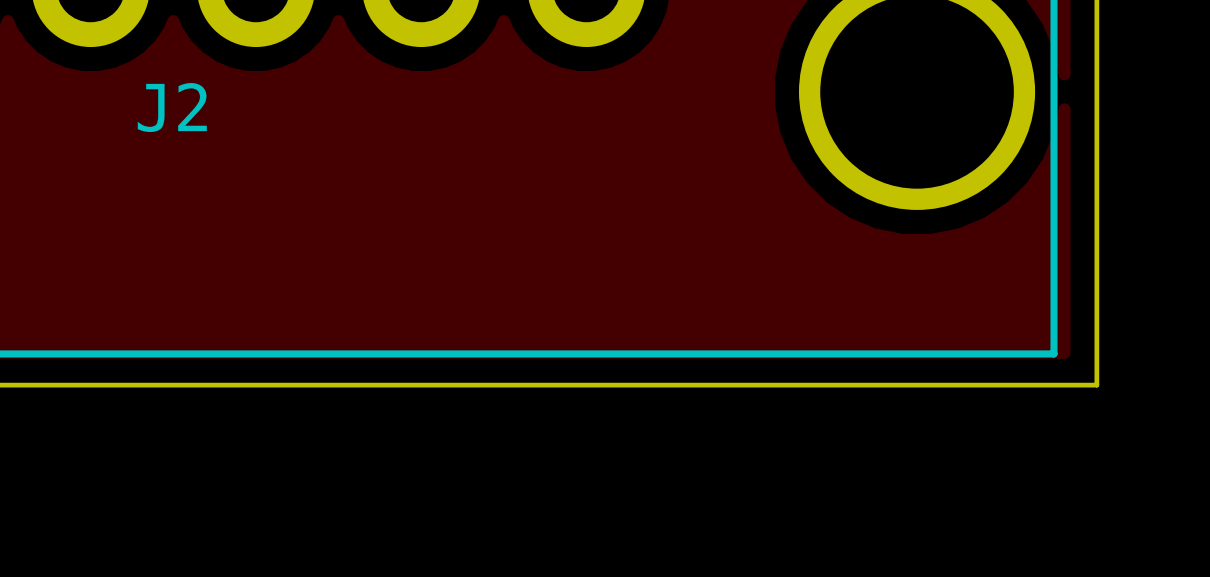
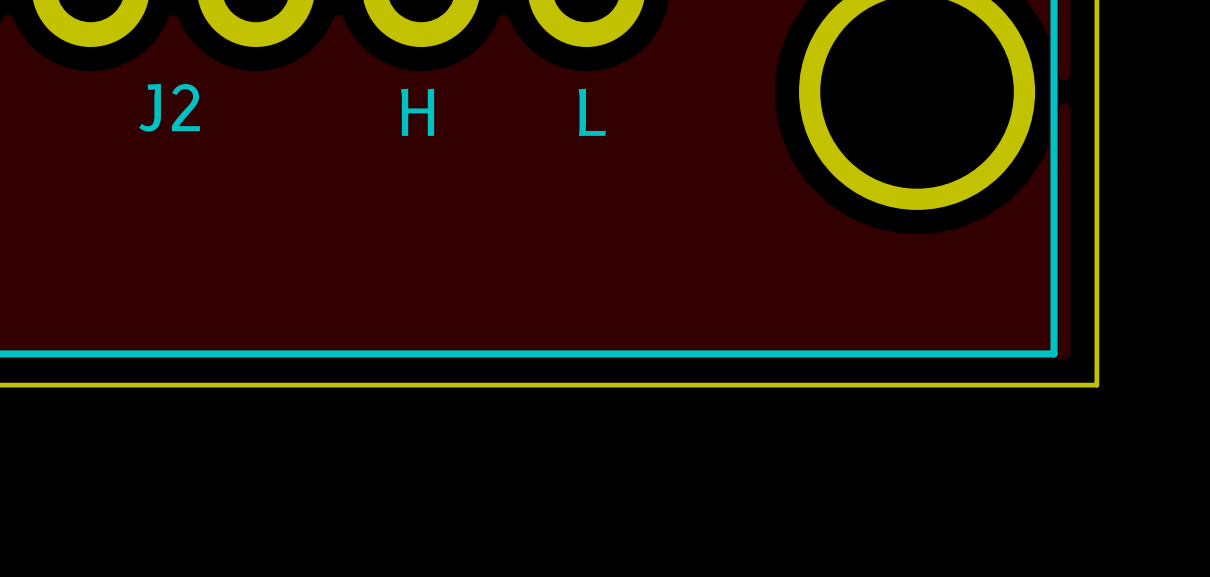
text: none -> H (417, 112)
text: none -> L (592, 112)

